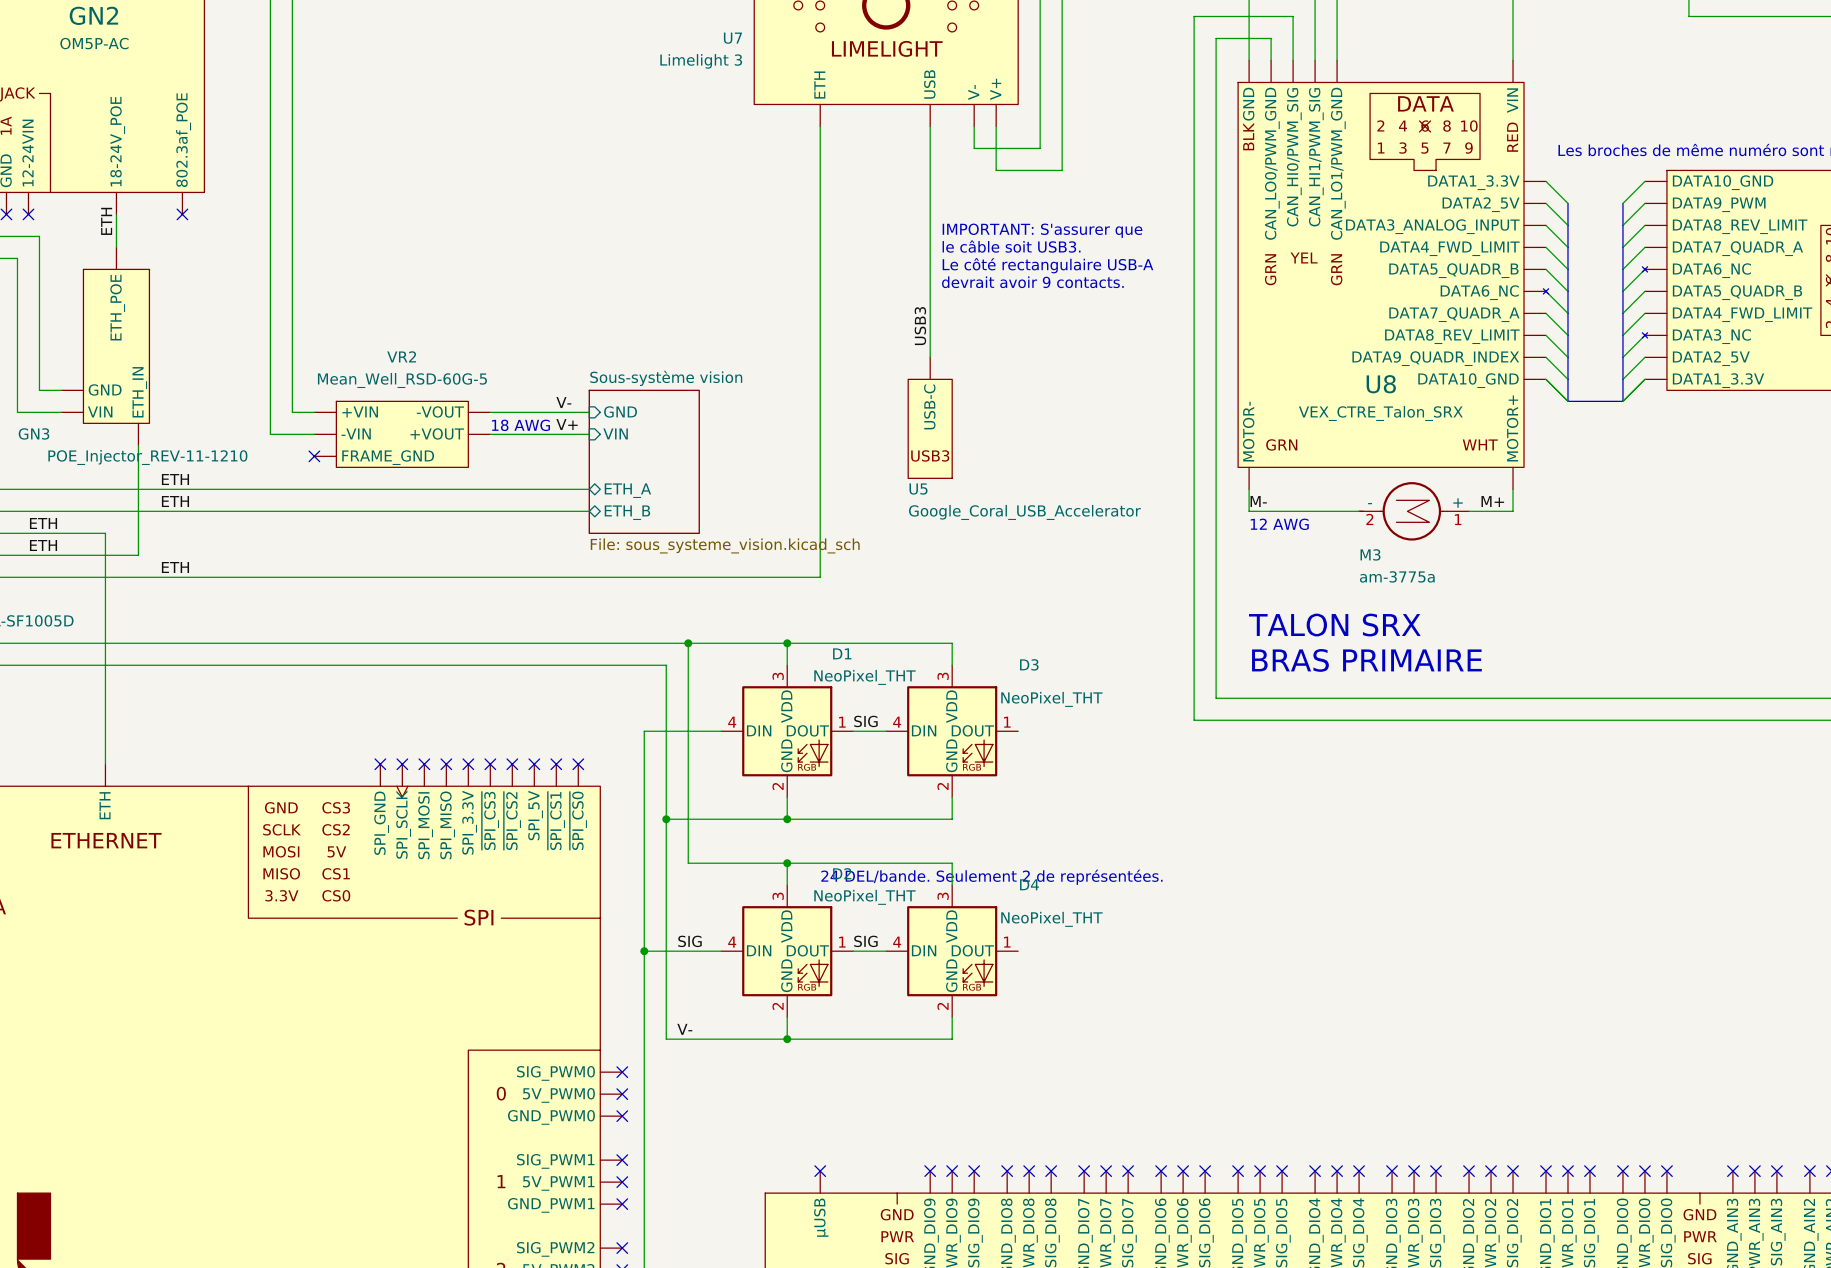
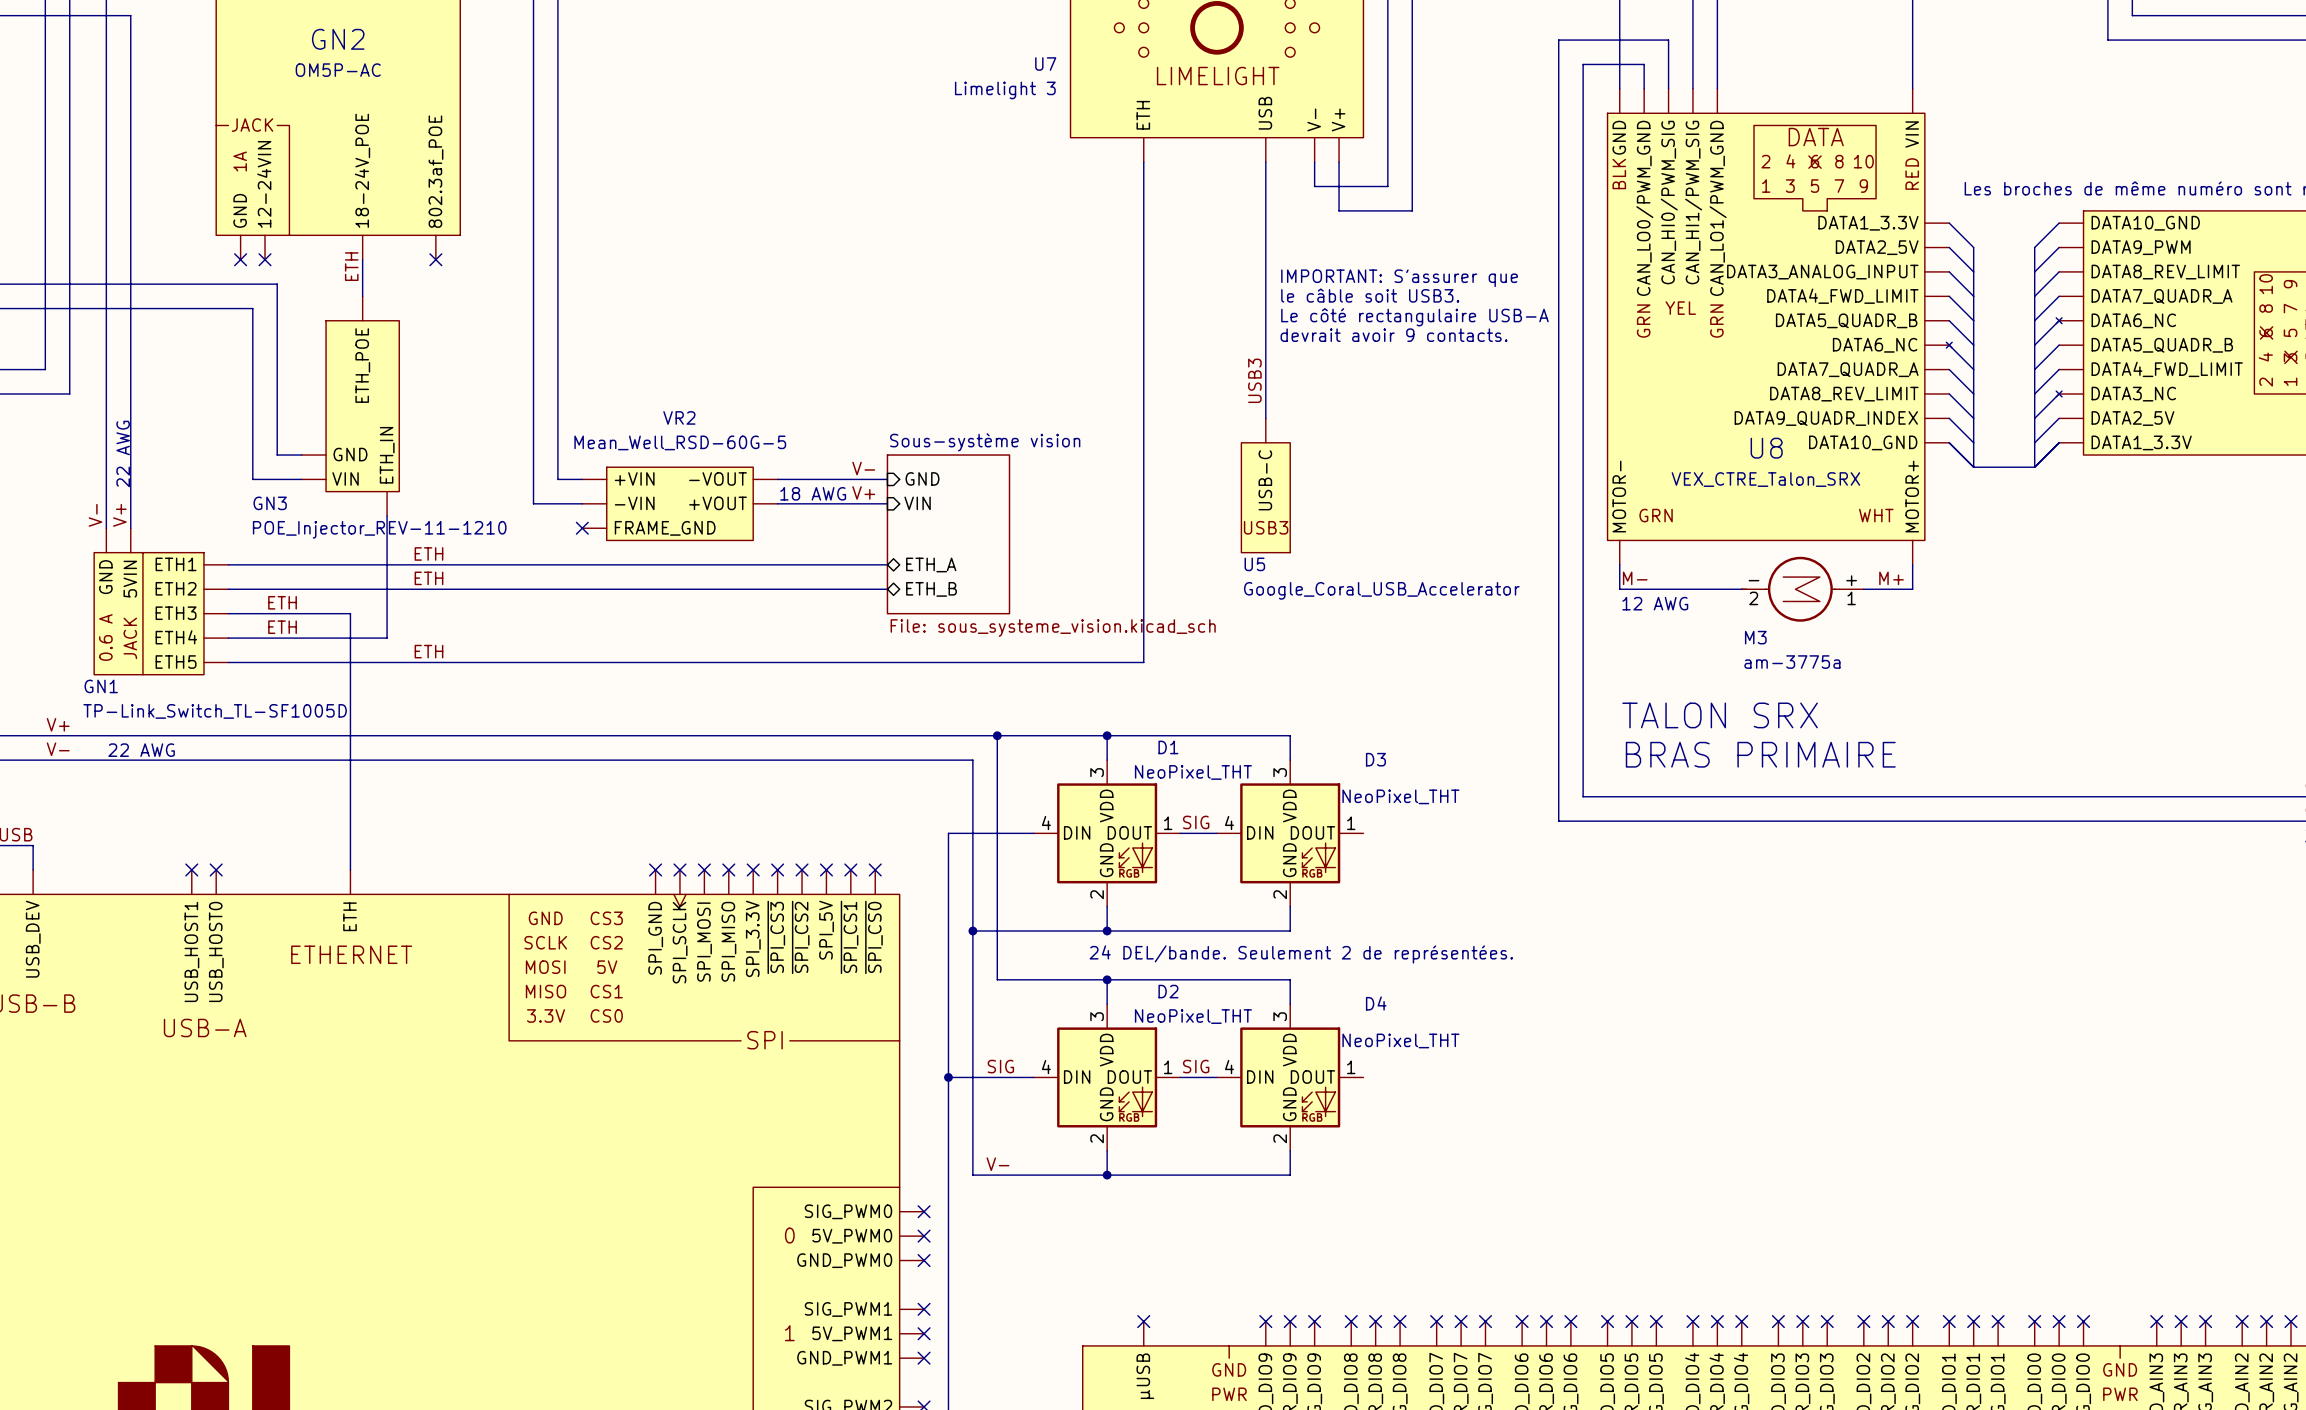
text position: 24 DEL/bande. Seulement 2 de représentées. (991, 877) -> 24 DEL/bande. Seulement 2 de représentées. (1301, 954)

